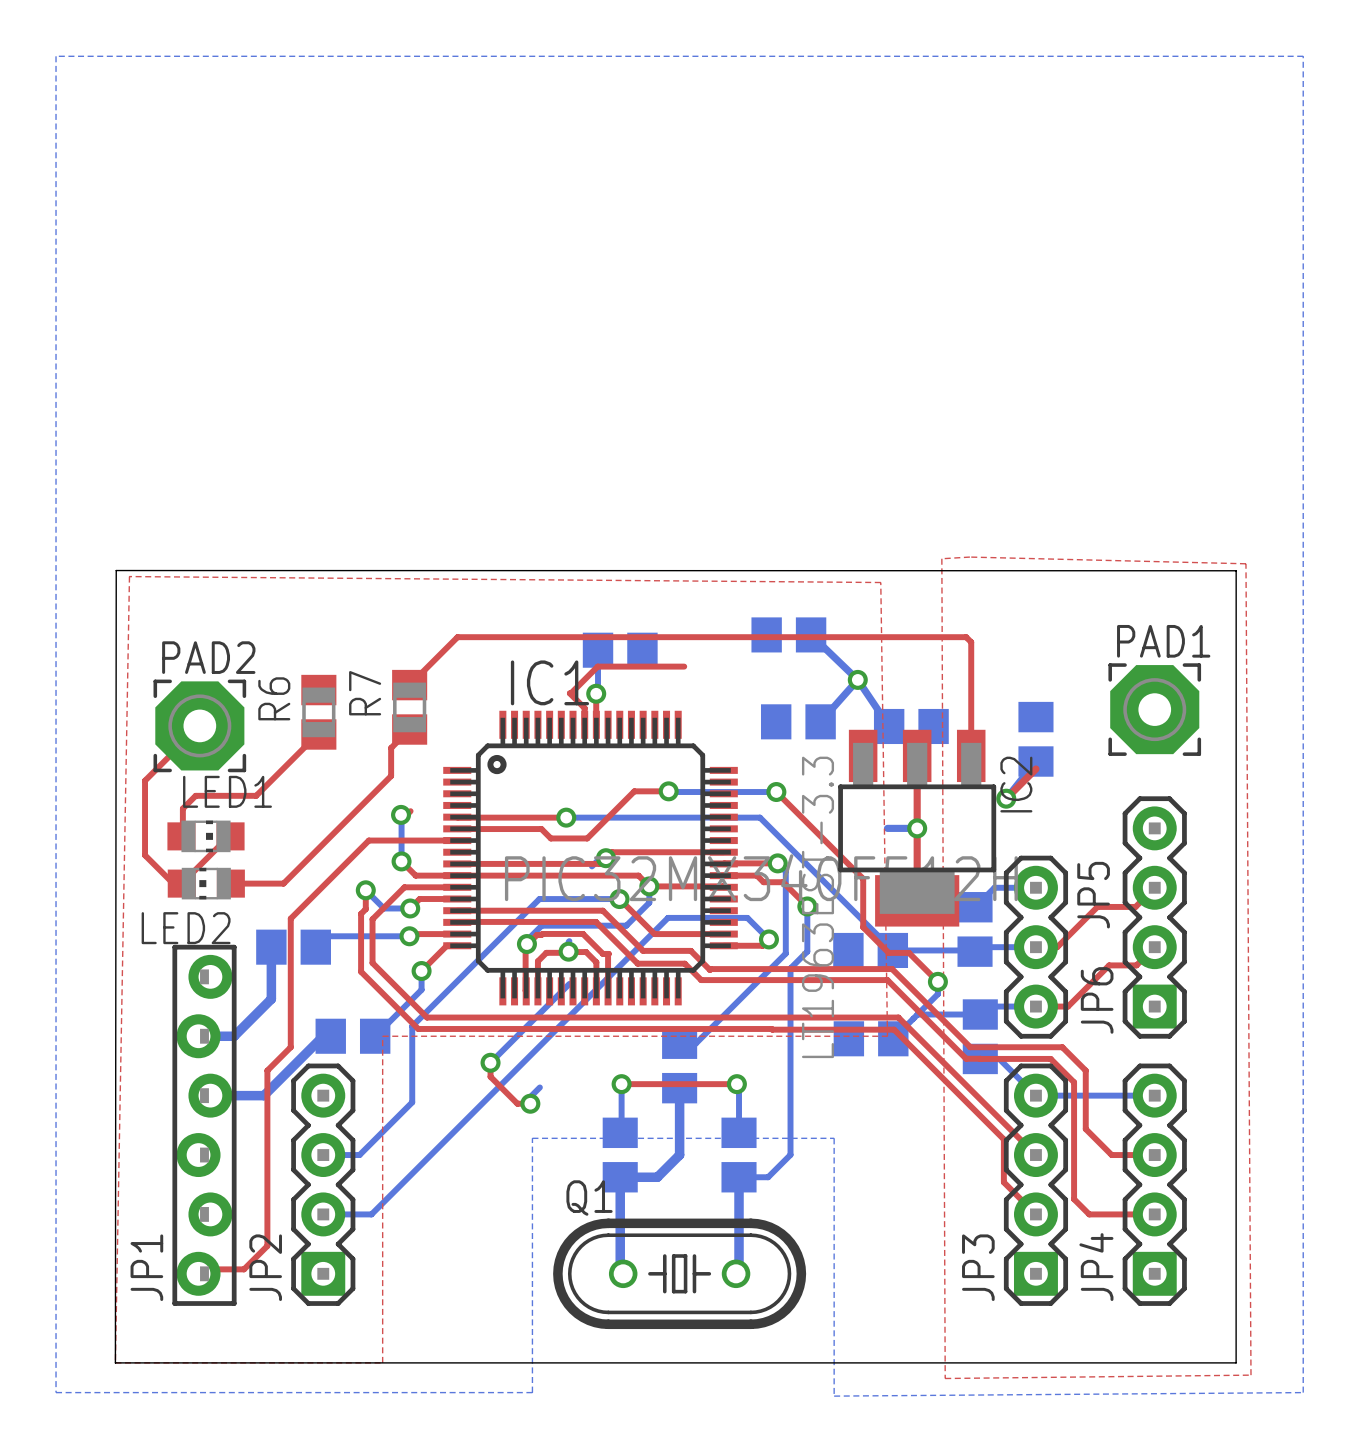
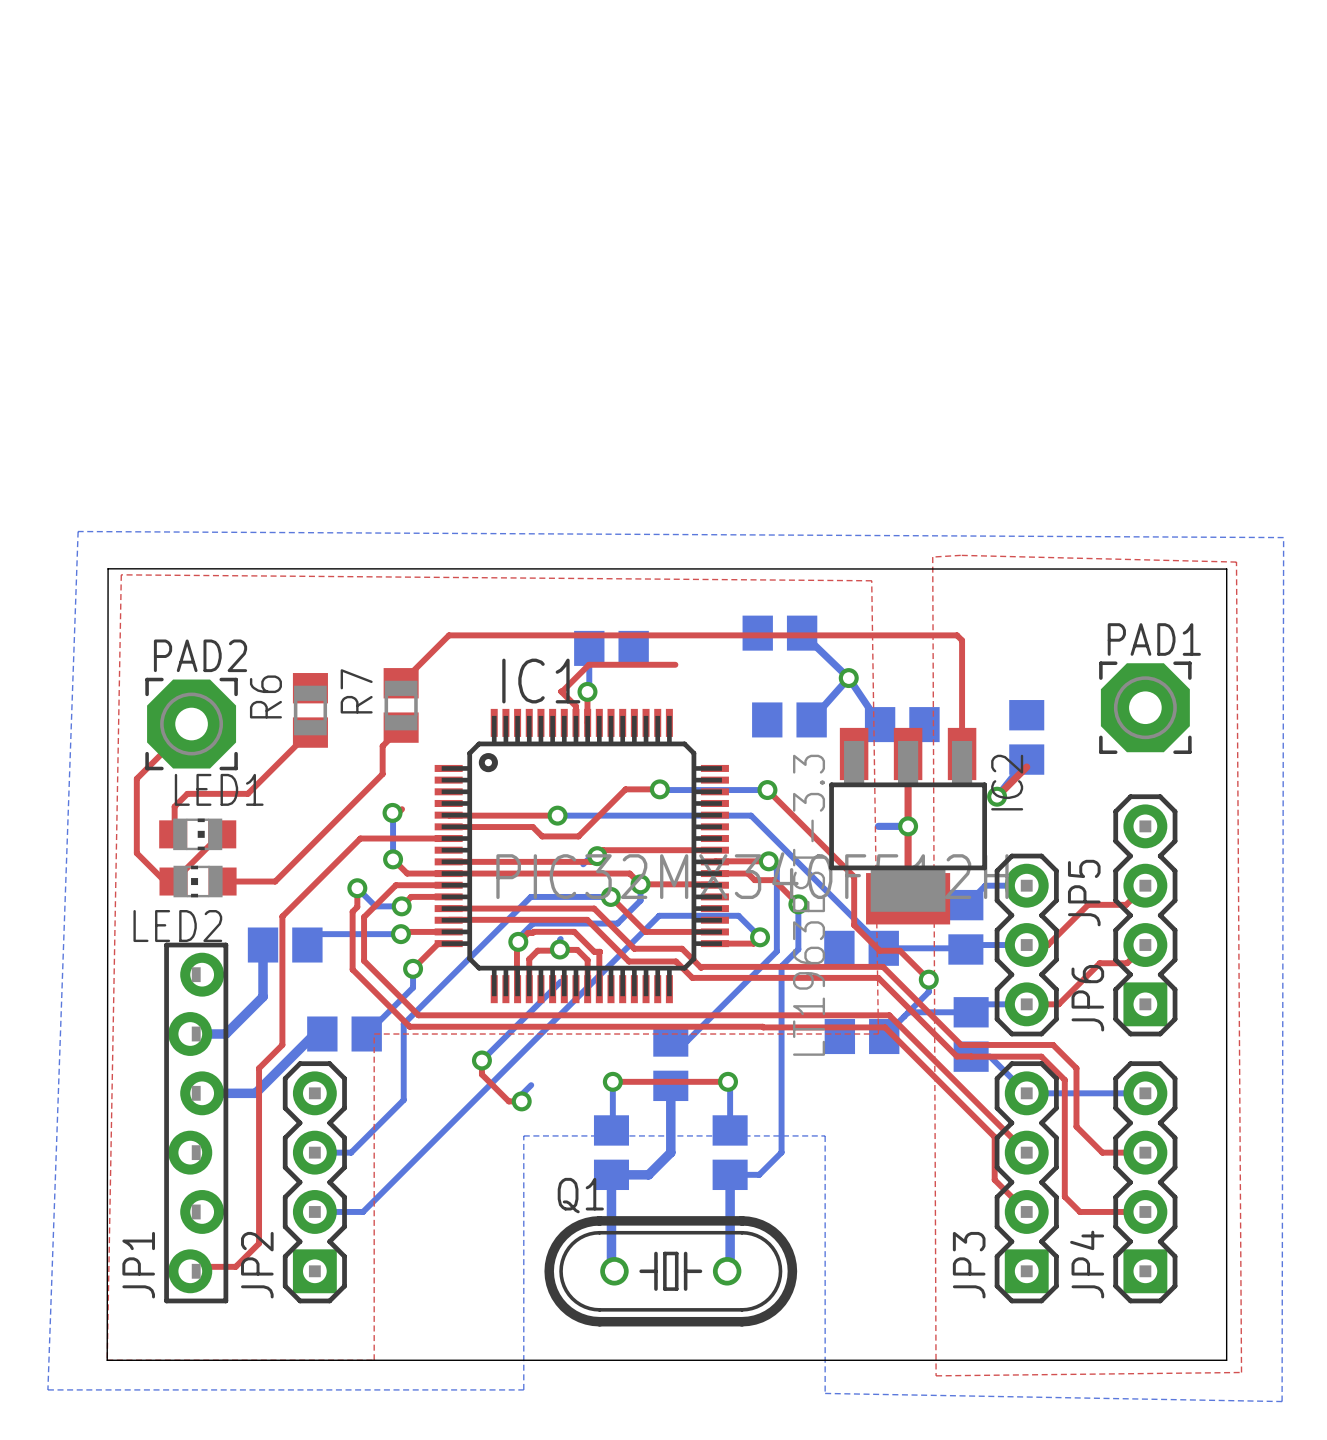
bottom zone outline: (56, 1392) (56, 56) (1303, 56) (1303, 1392) (834, 1396) -> (47, 1389) (78, 531) (1283, 537) (1282, 1401) (825, 1393)

